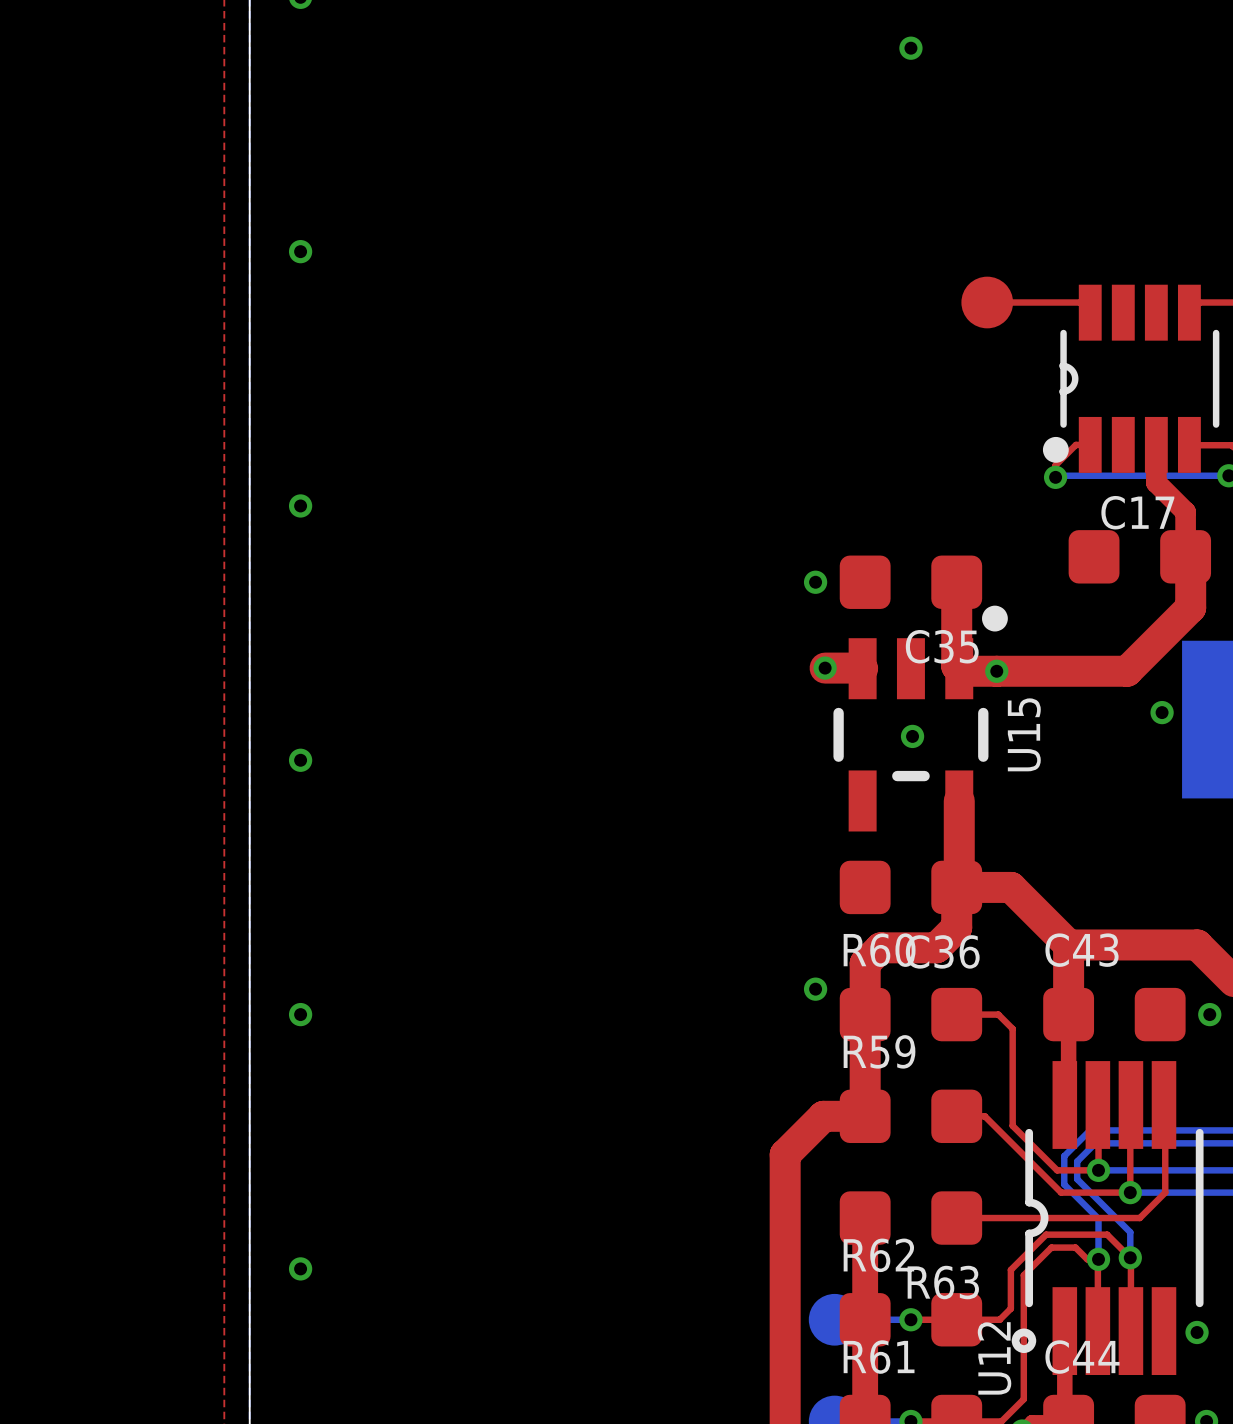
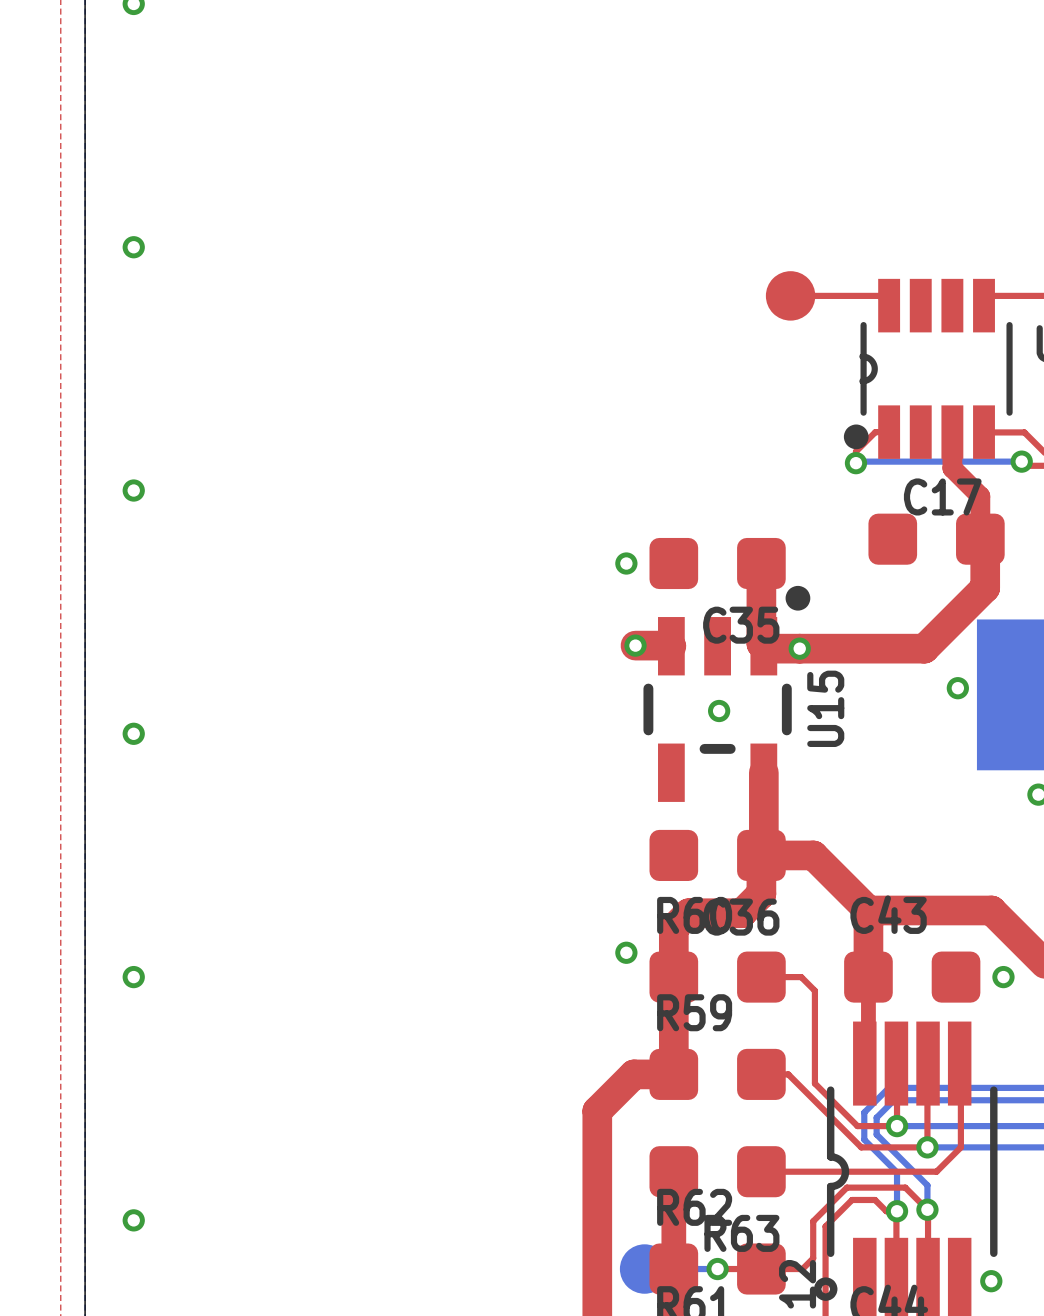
via: (910, 48) -> none

